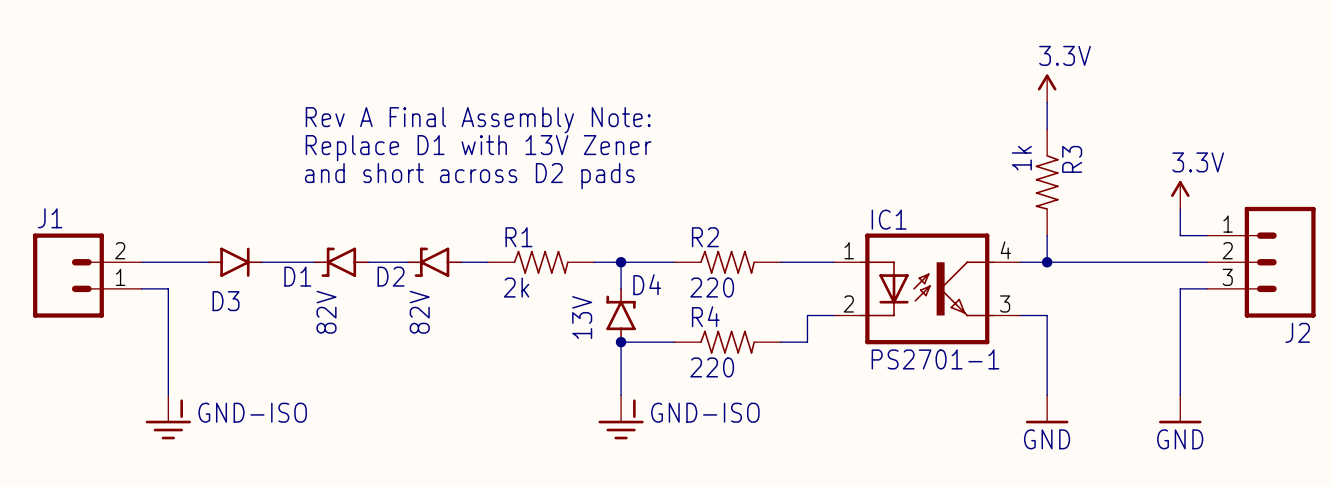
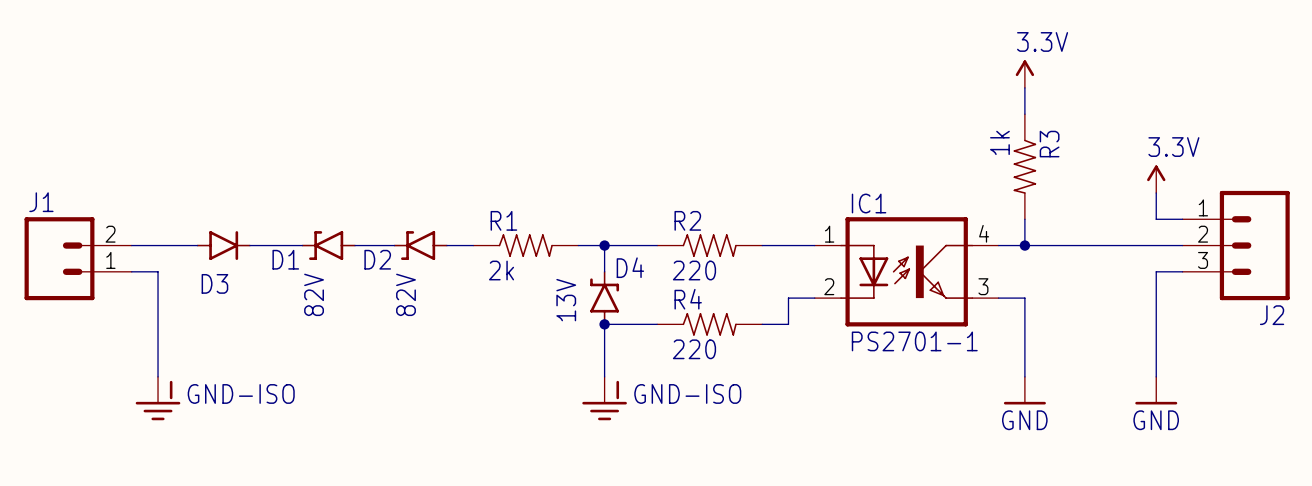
text: Rev A Final Assembly Note: (478, 120) -> none
text: Replace D1 with 13V Zener (478, 148) -> none
text: and short across D2 pads (469, 176) -> none

